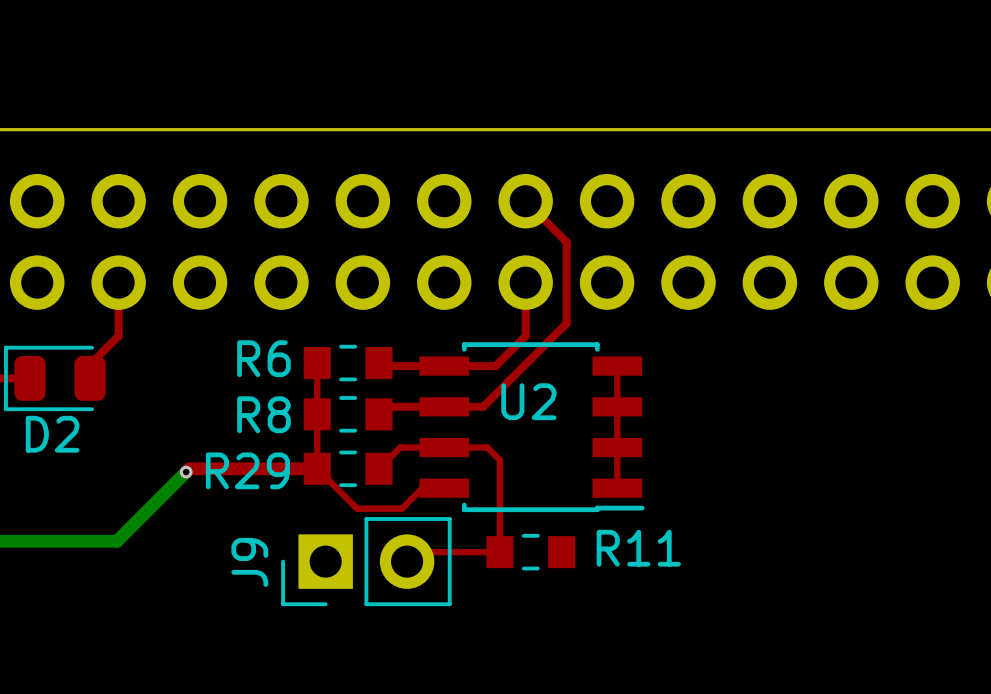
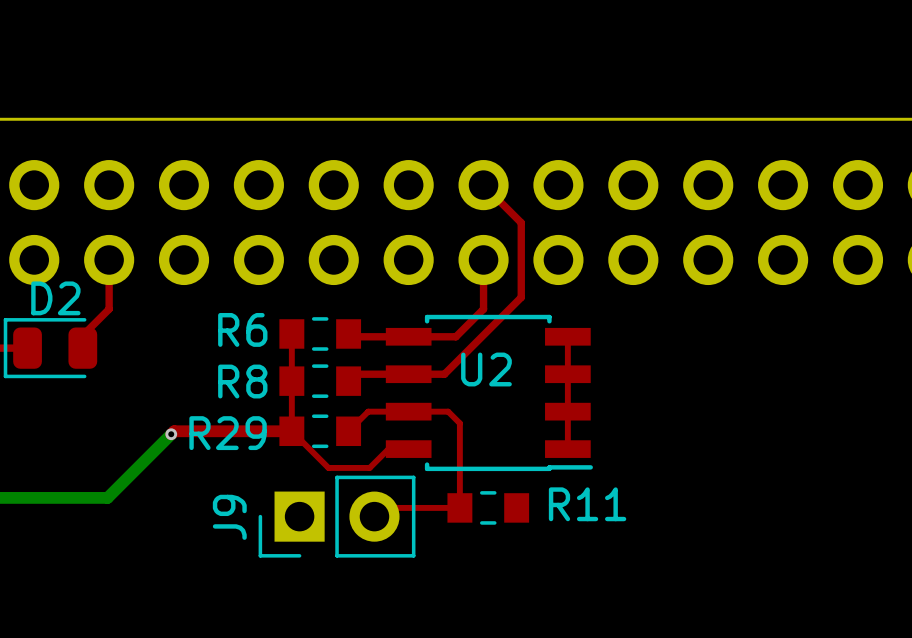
D2 name position: D2 (52, 434) -> D2 (55, 298)

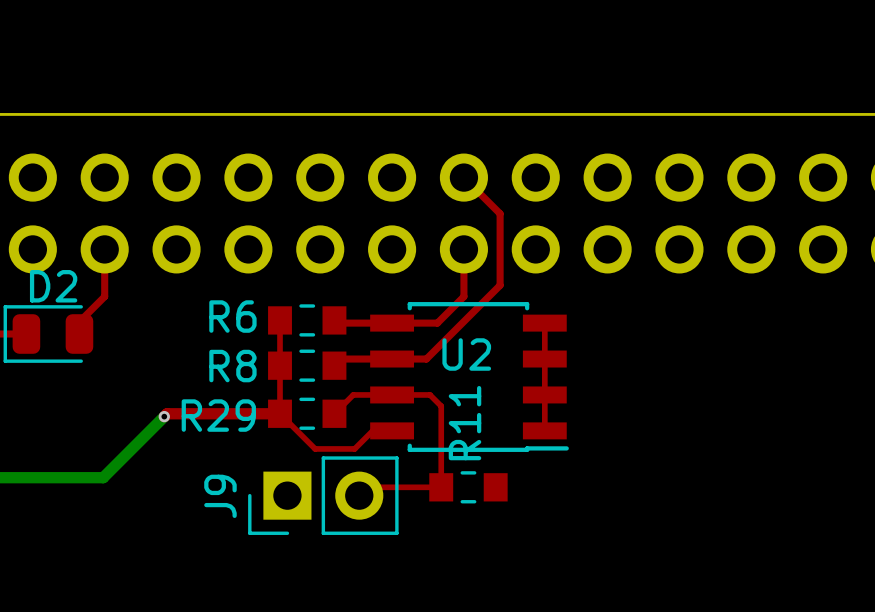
R11 name rotation: 0° (587, 504) -> 90° counterclockwise (465, 423)
R11 name position: R11 (587, 504) -> R11 (465, 423)

